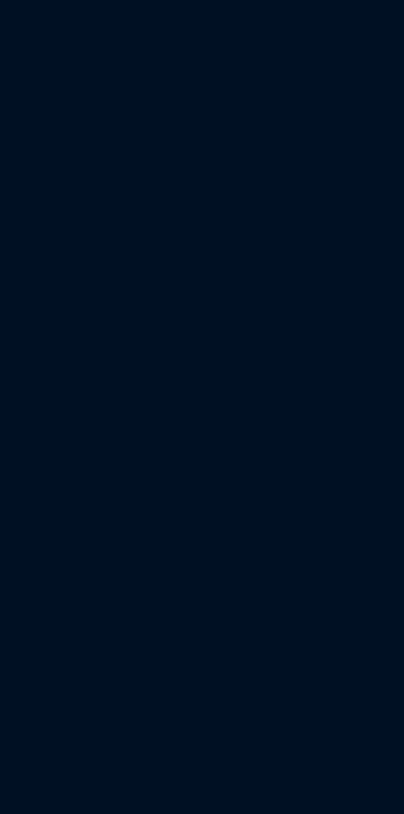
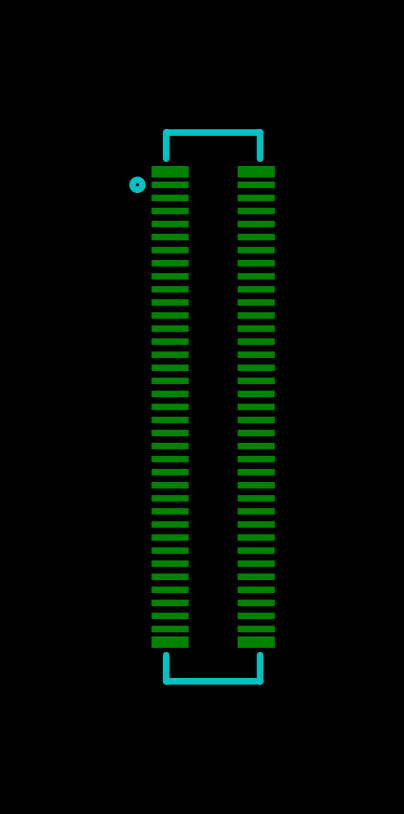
part: none -> (202, 406)

